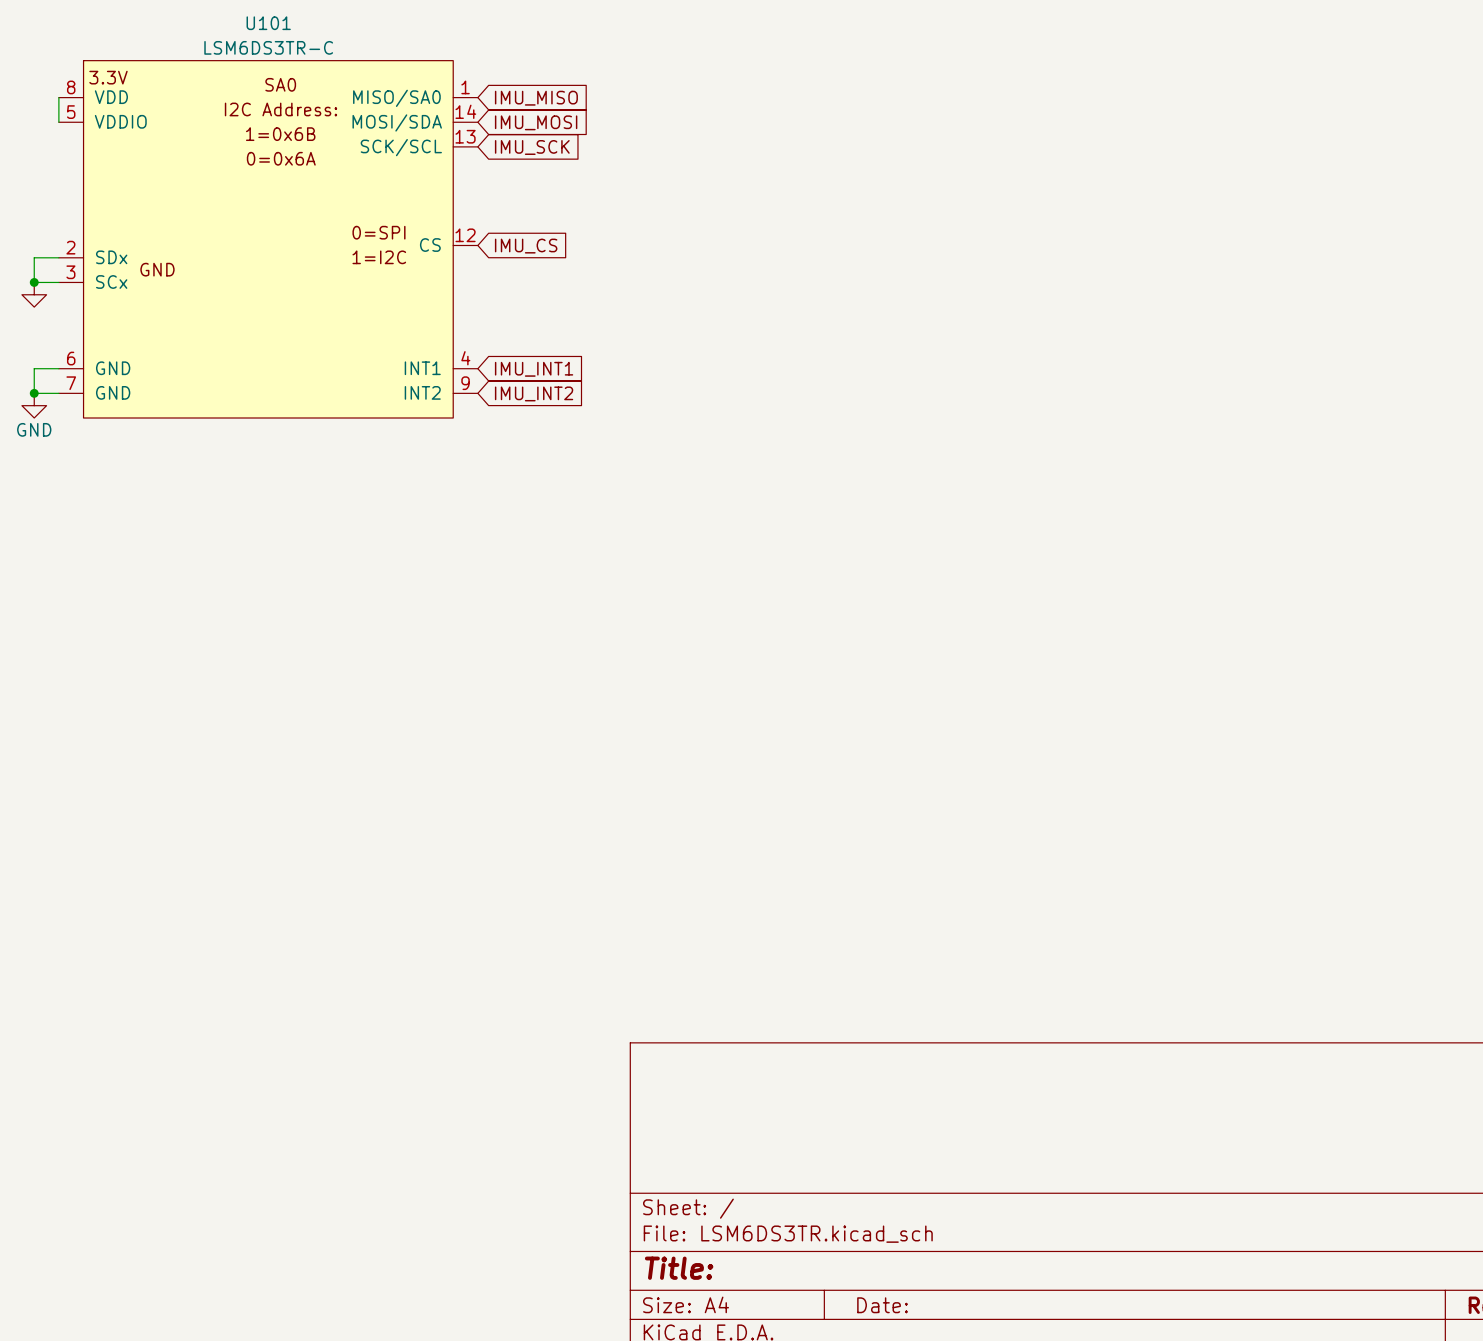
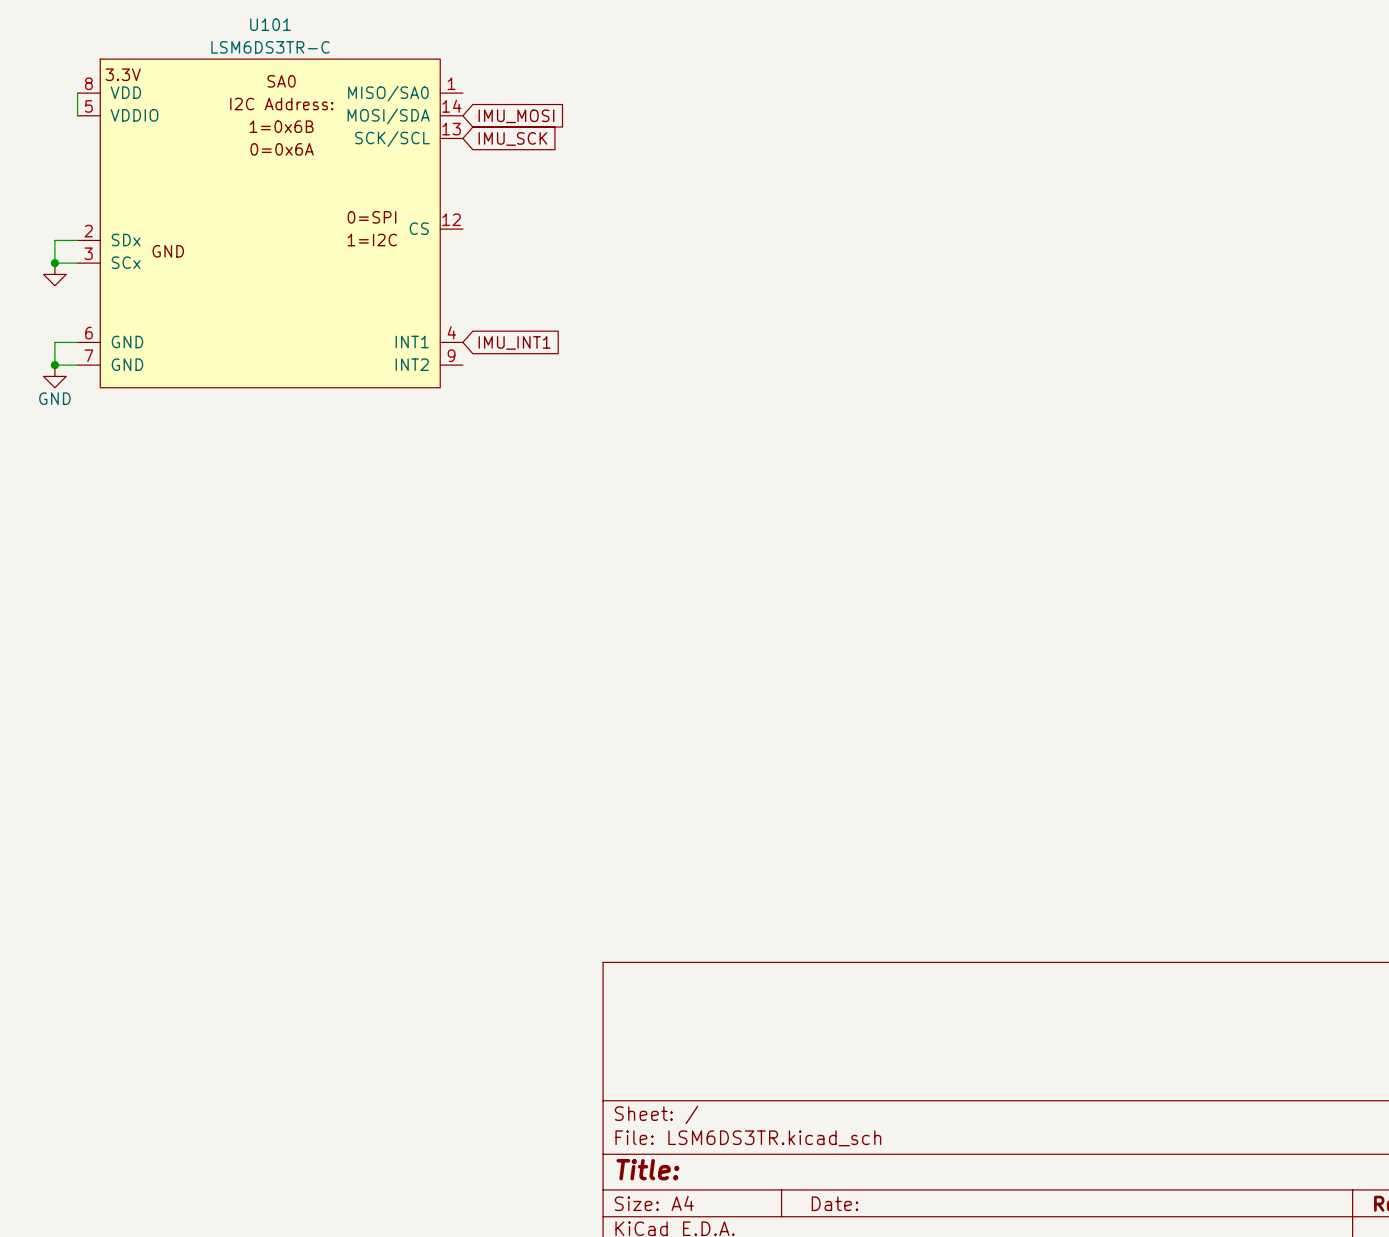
global label: IMU_MISO (536, 98) -> none
global label: IMU_CS (526, 246) -> none
global label: IMU_INT2 (534, 393) -> none

